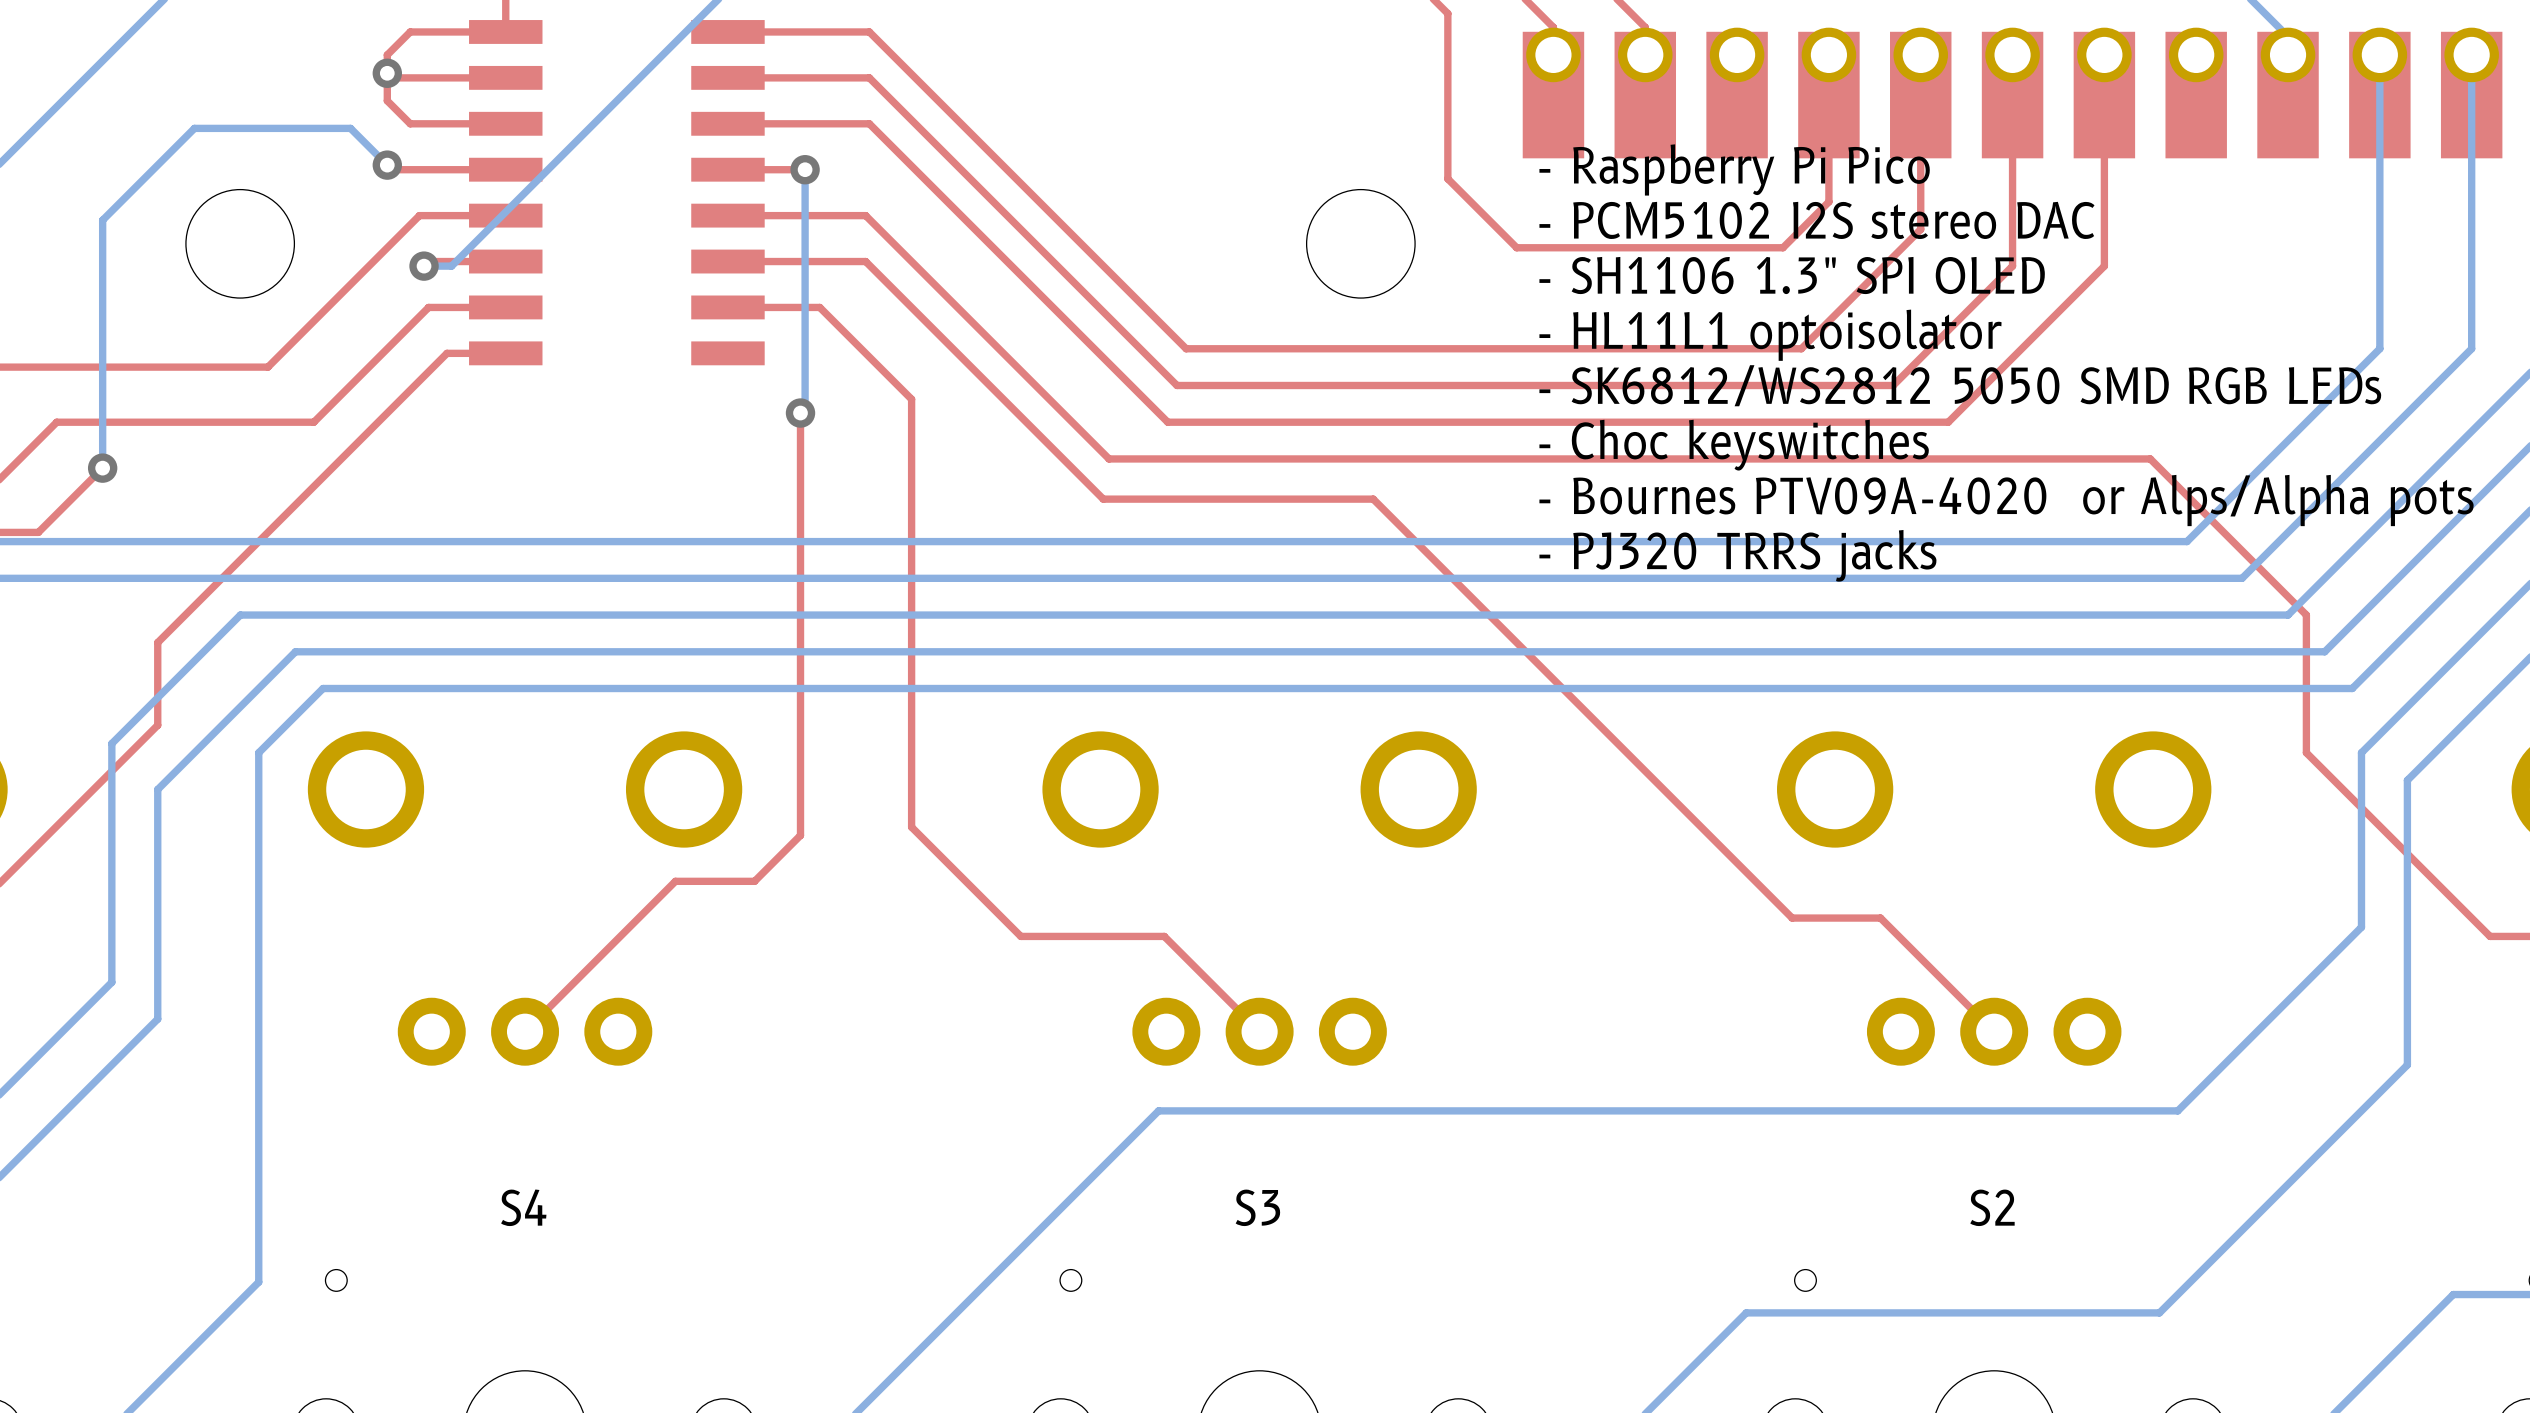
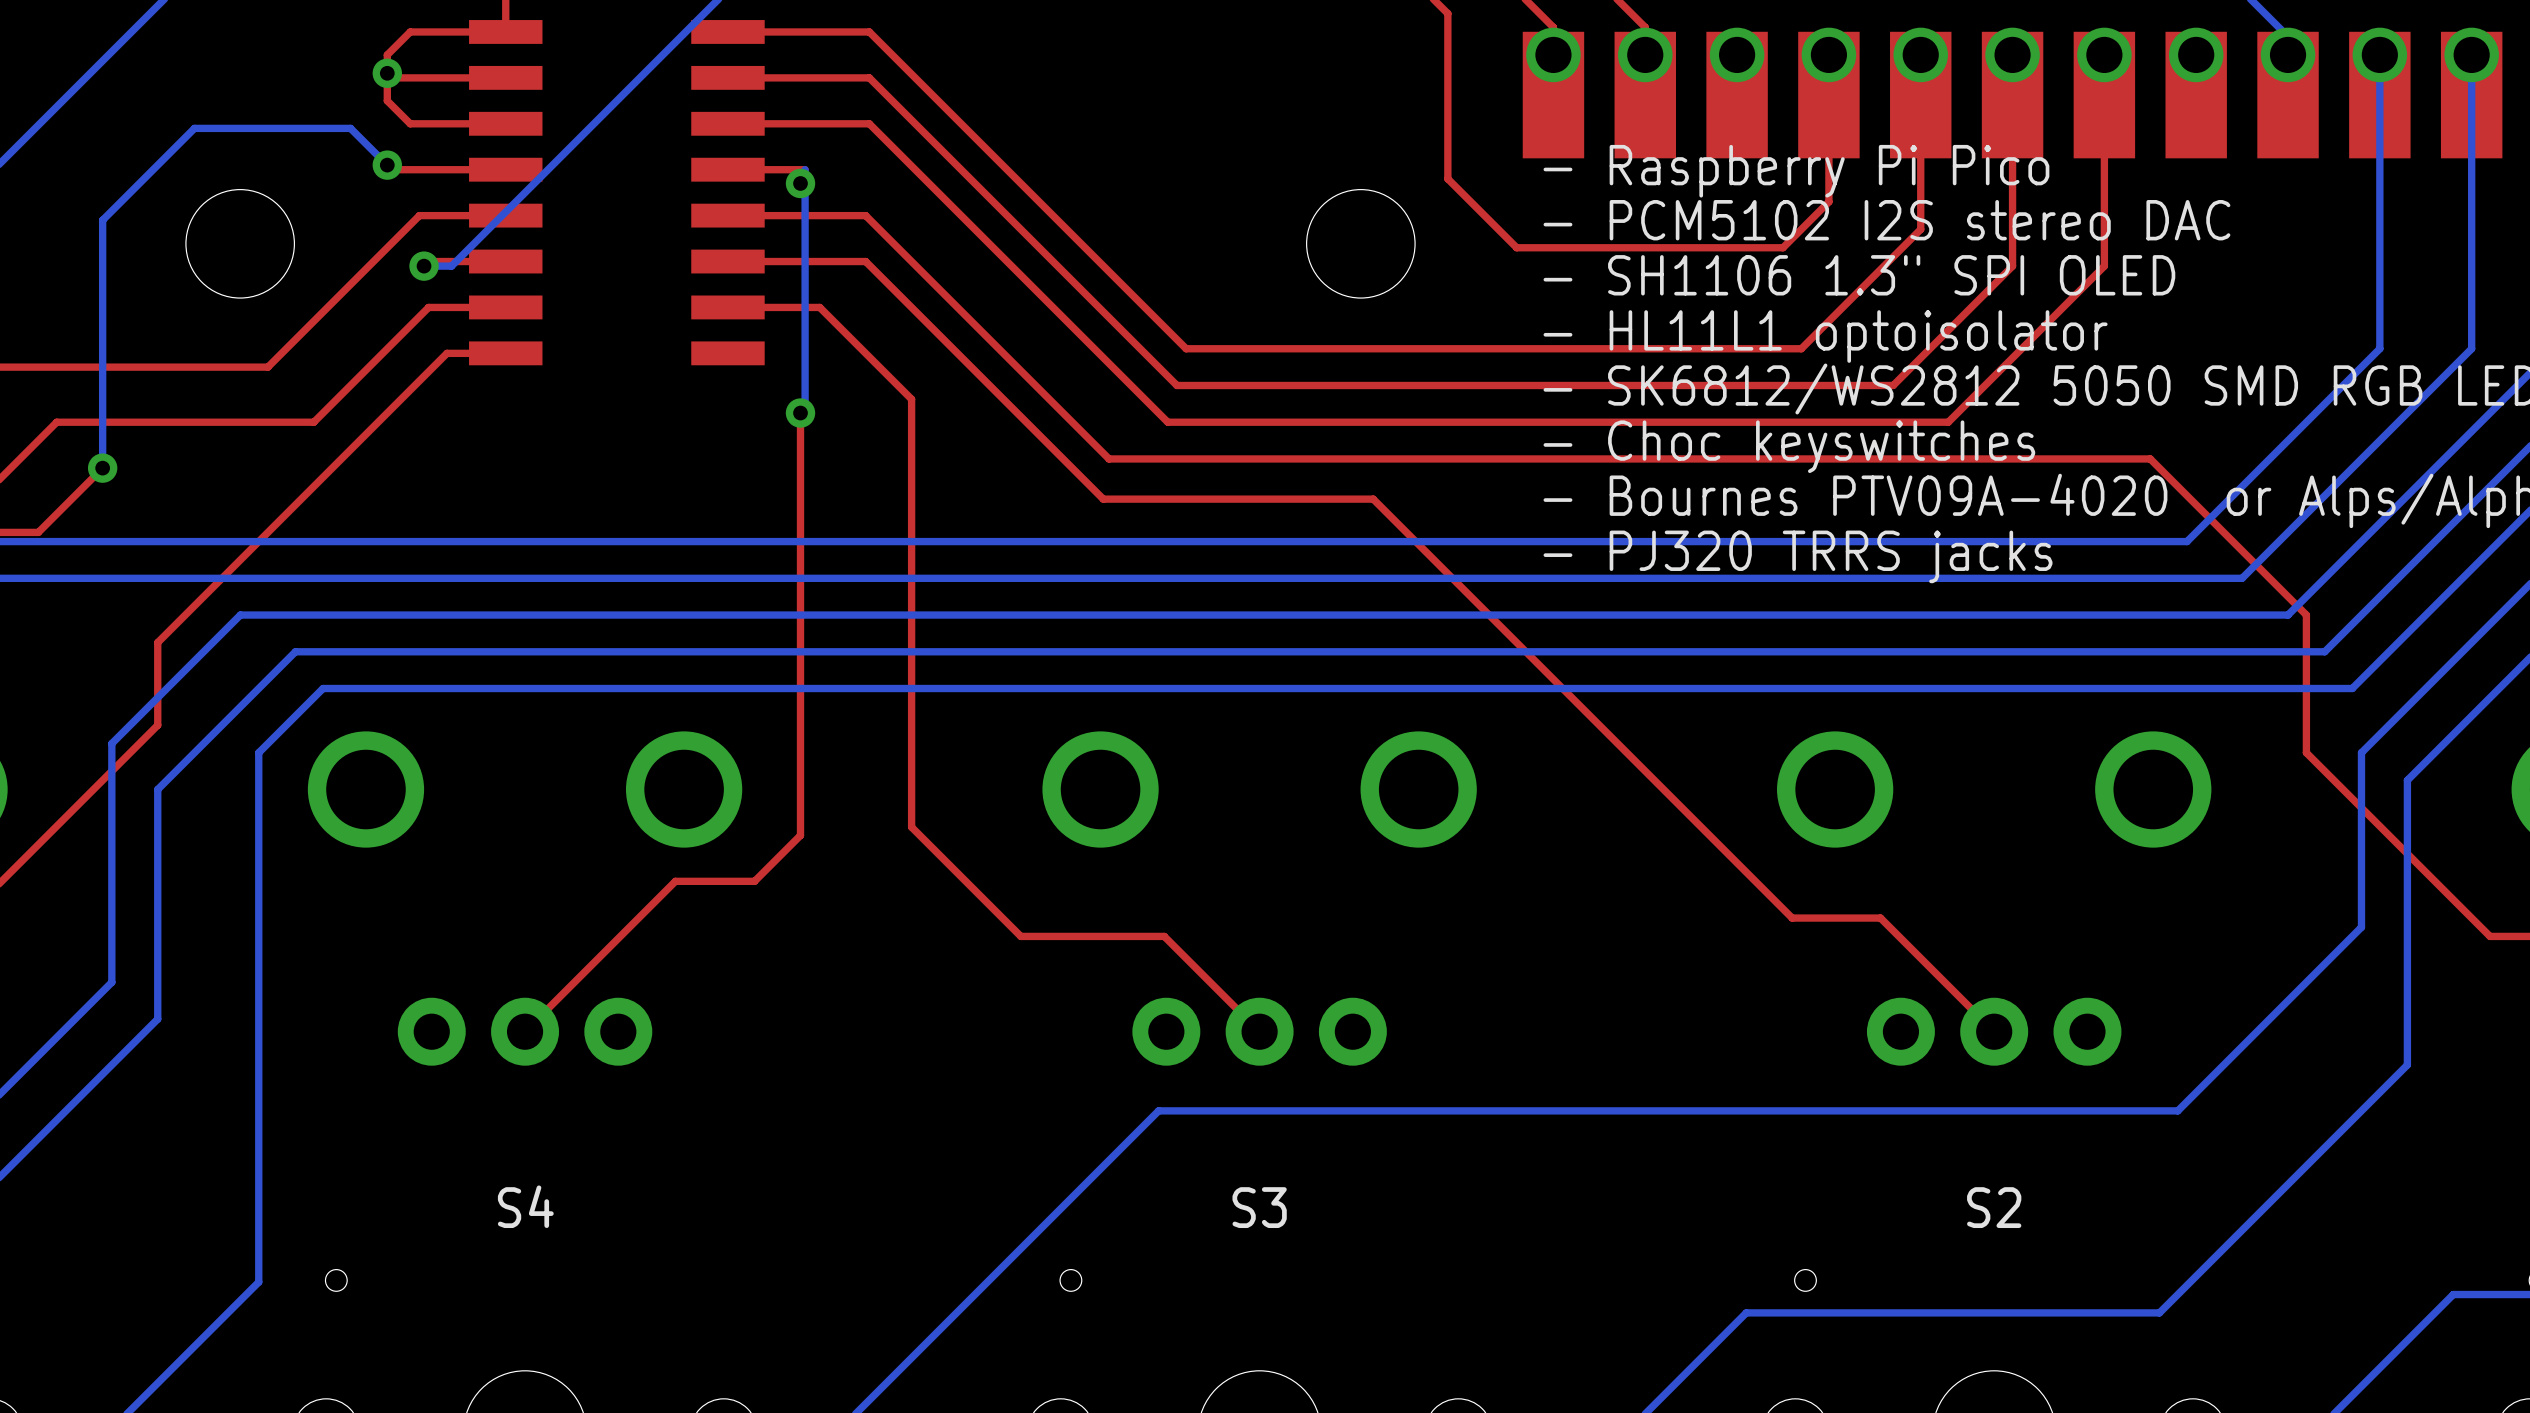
via position: (805, 169) -> (800, 183)

